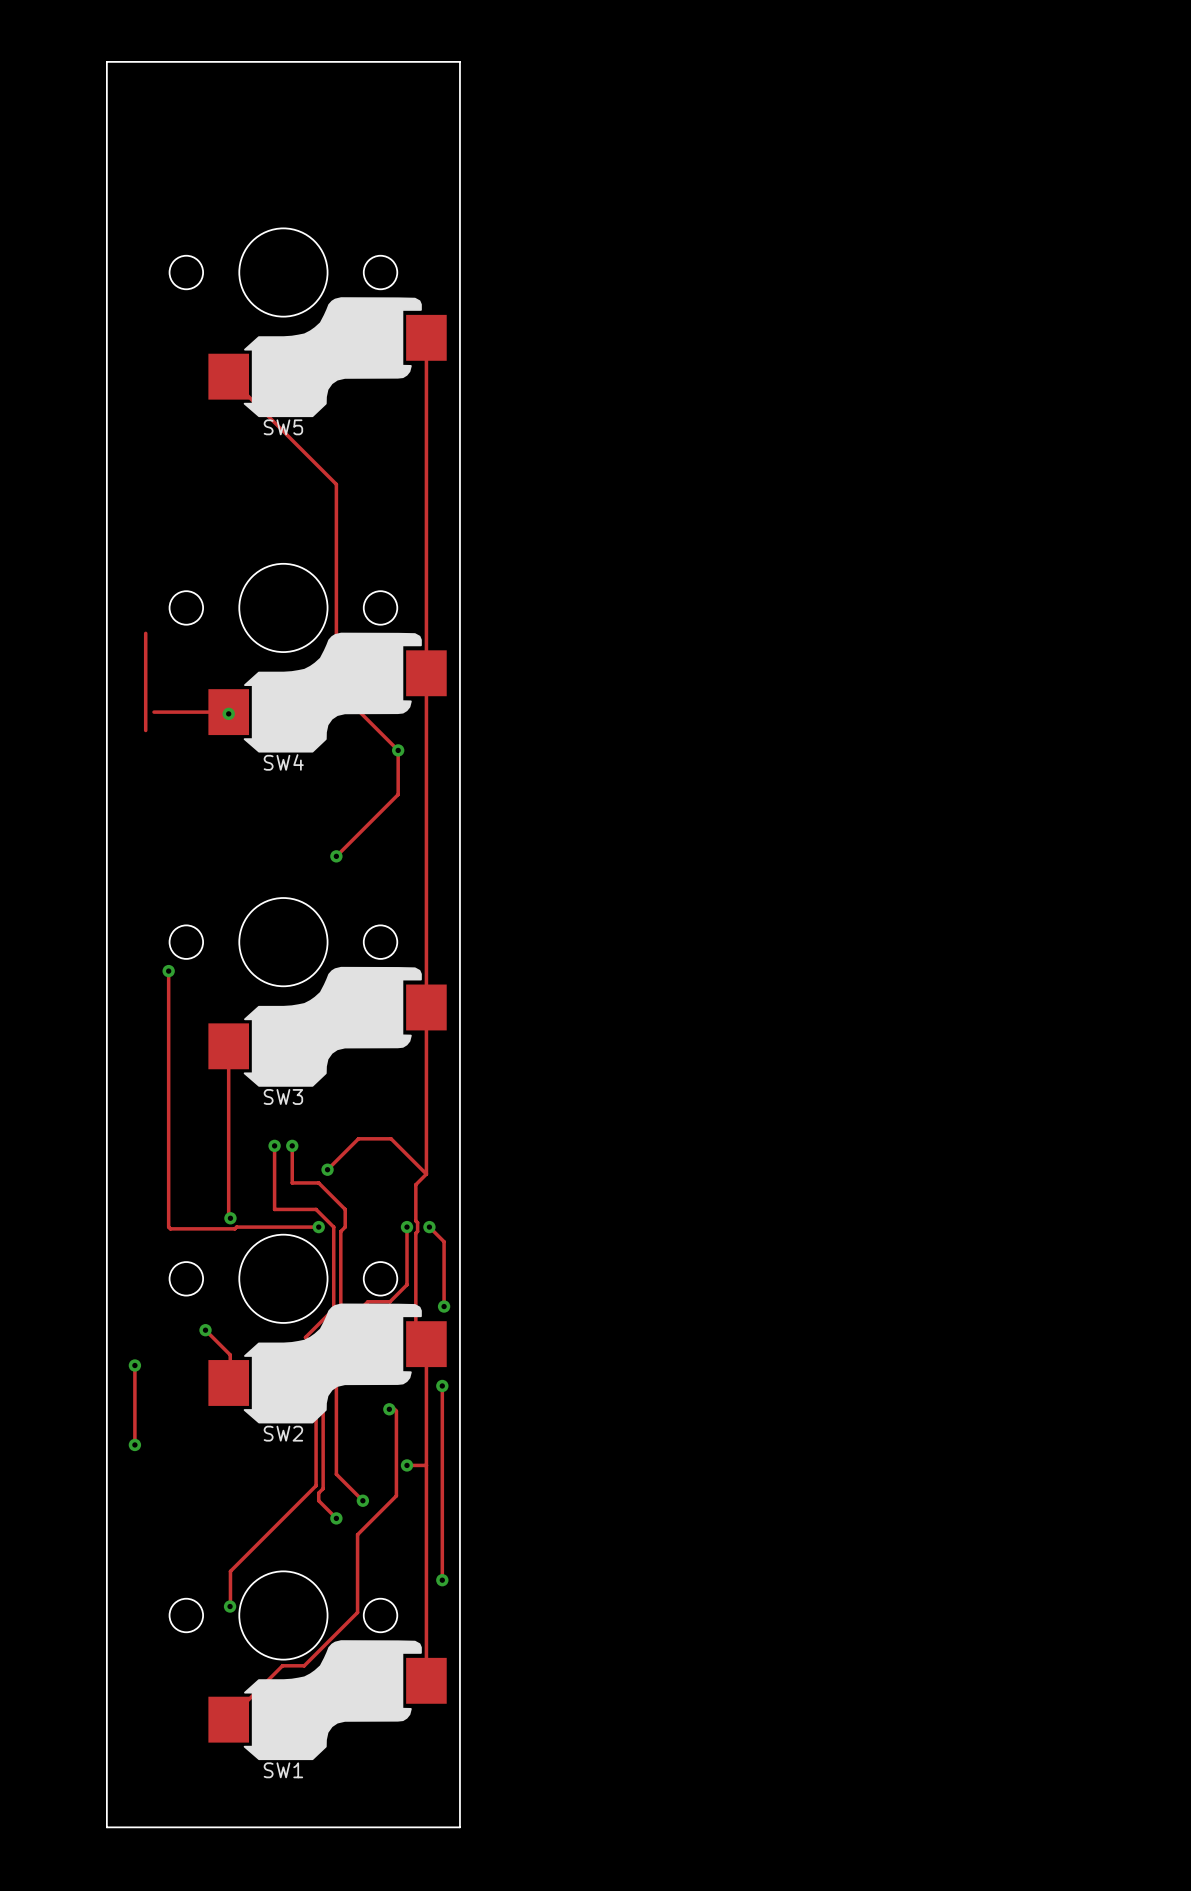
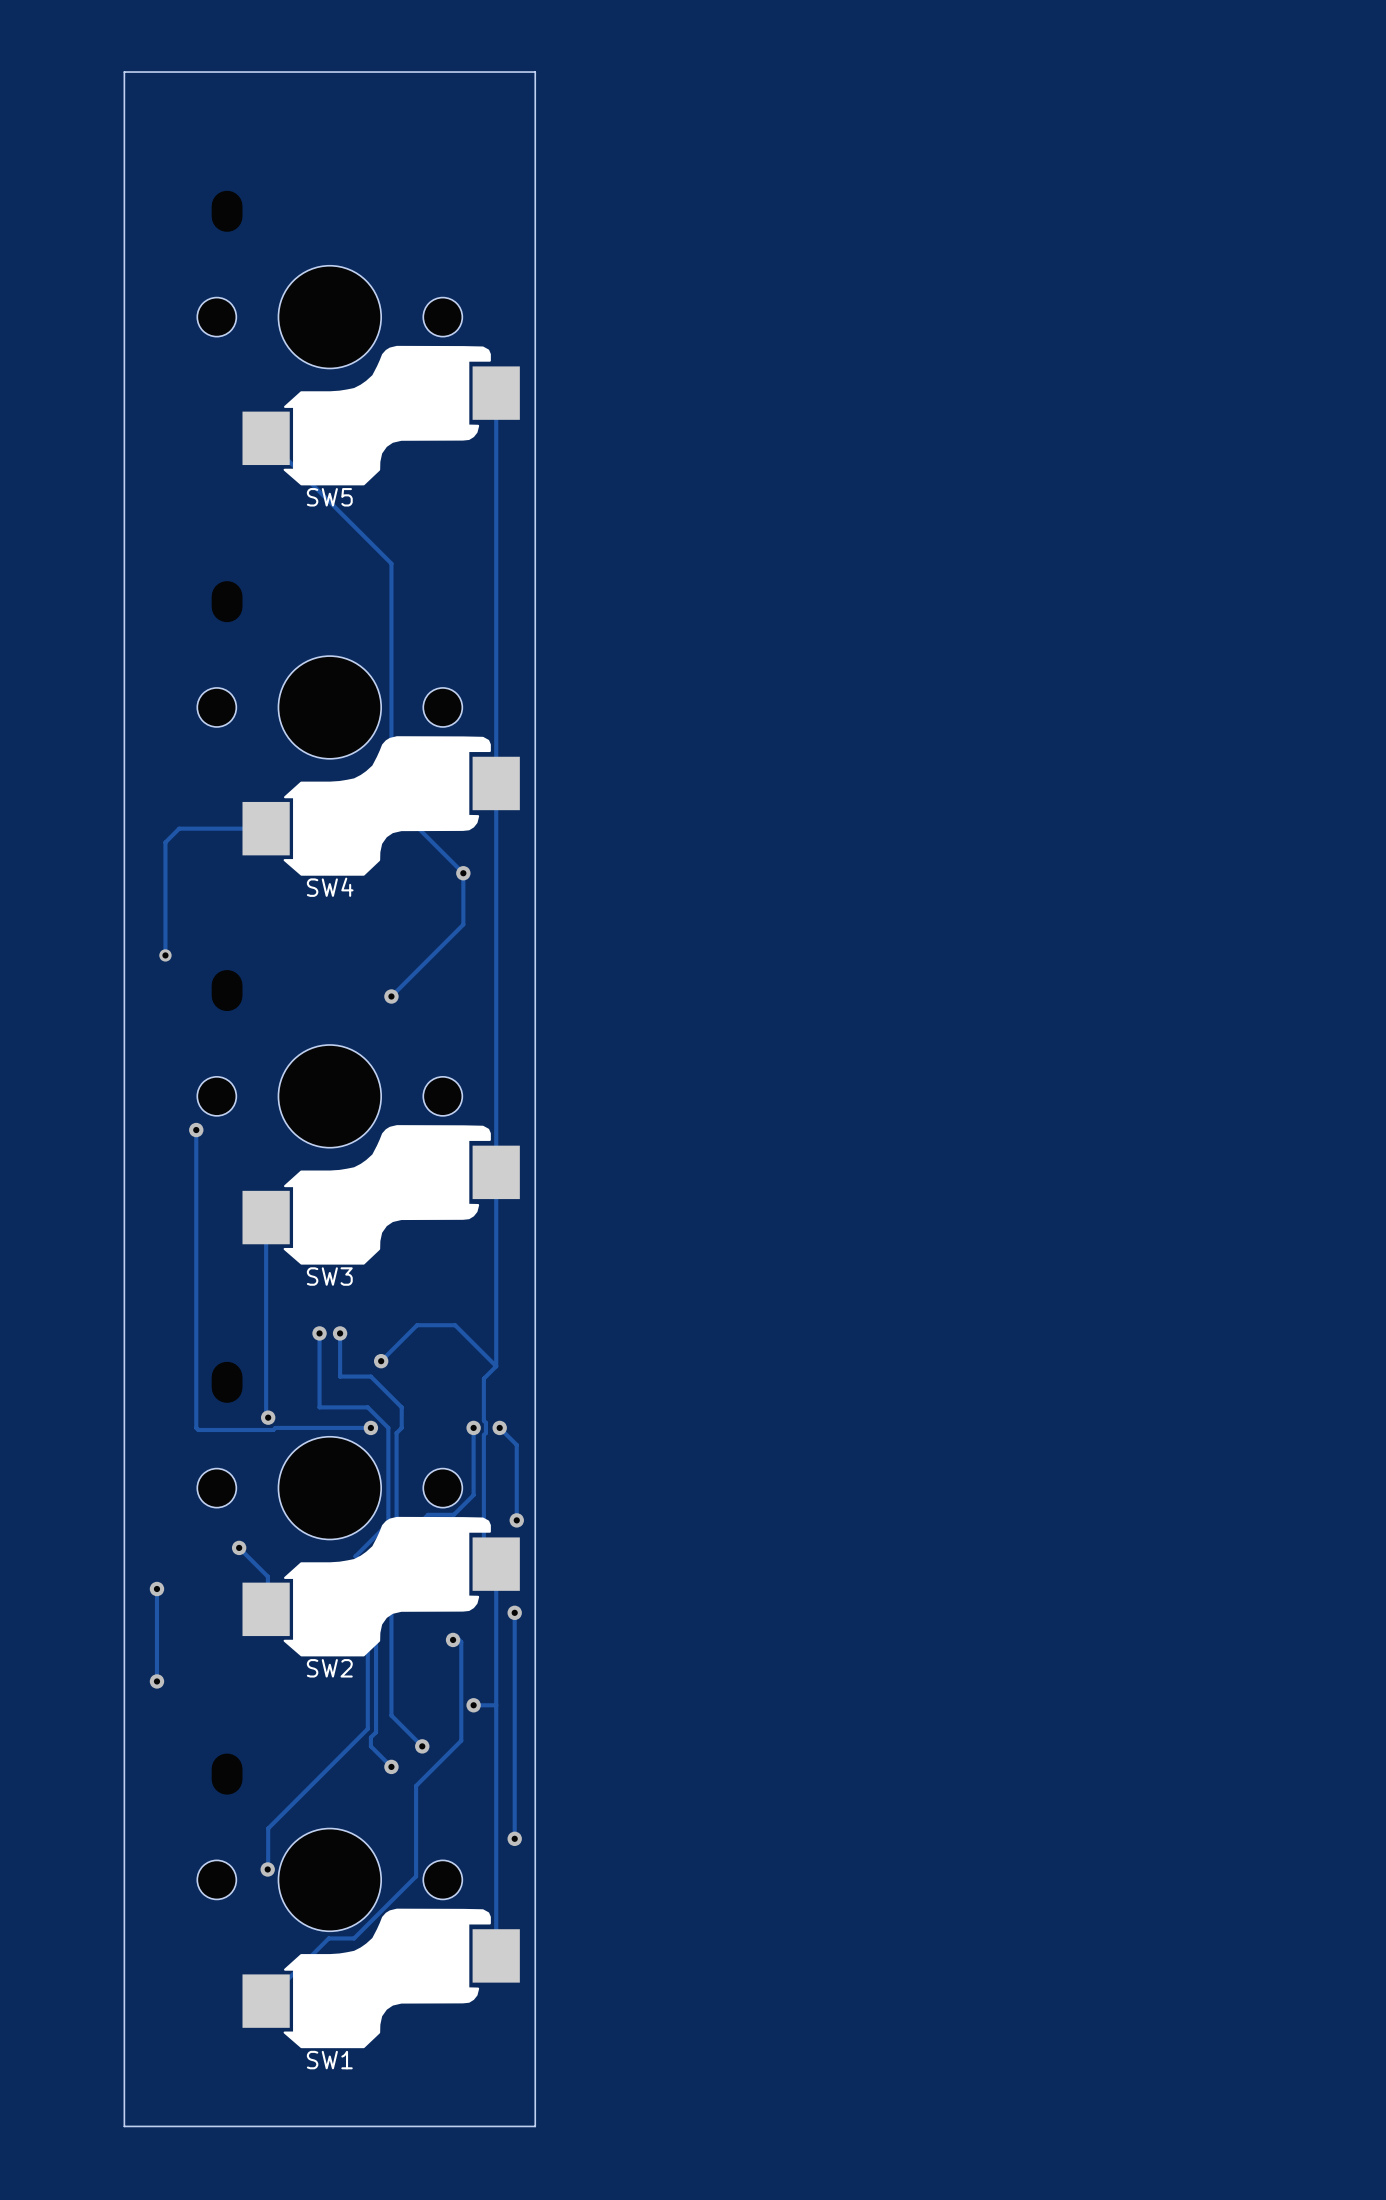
track: (145, 633) (145, 730) -> none
track: none -> (179, 828) (165, 842) (165, 955)
via: (228, 713) -> none
via: none -> (165, 955)

